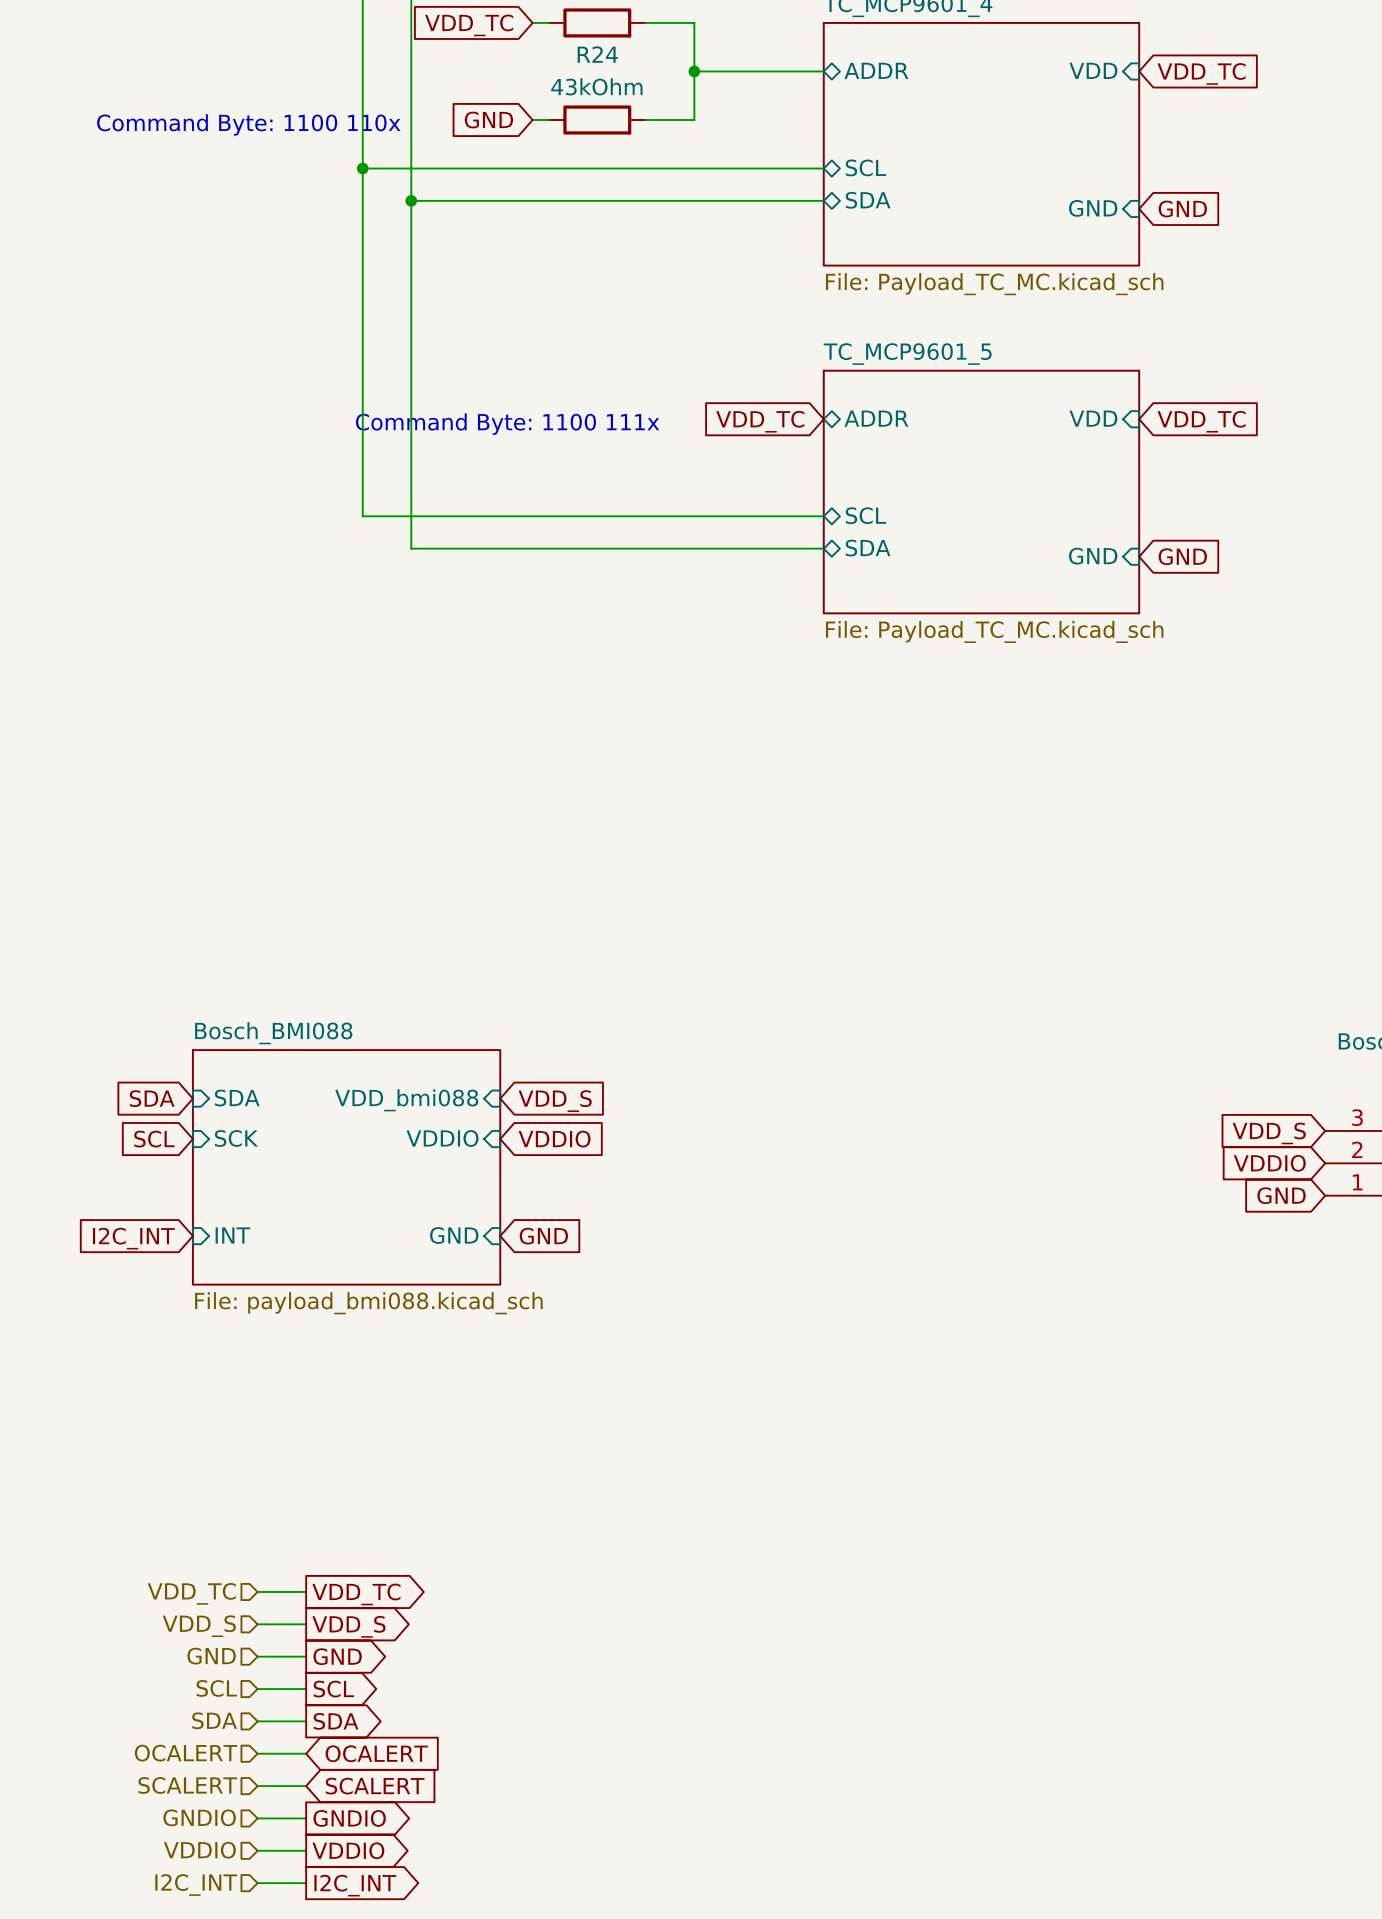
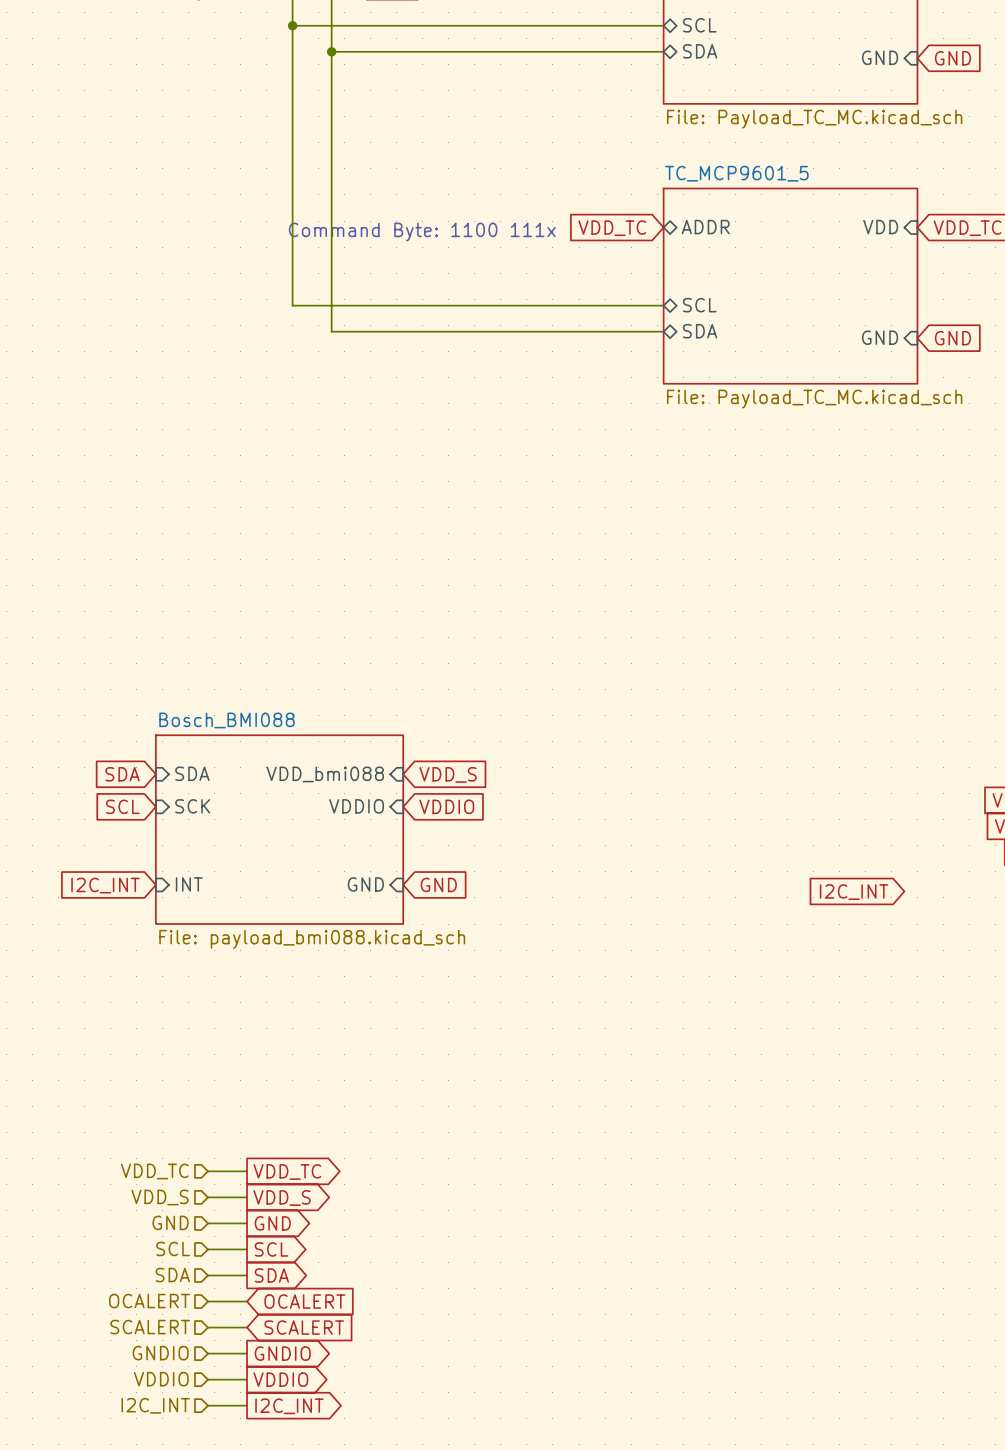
global label: none -> I2C_INT (854, 892)

